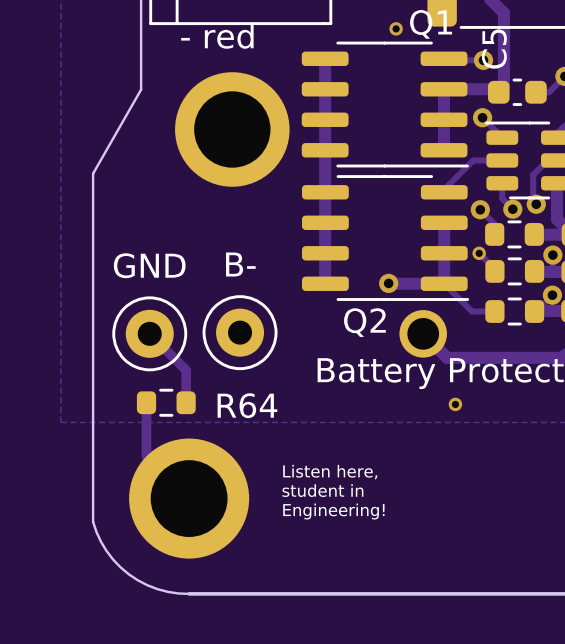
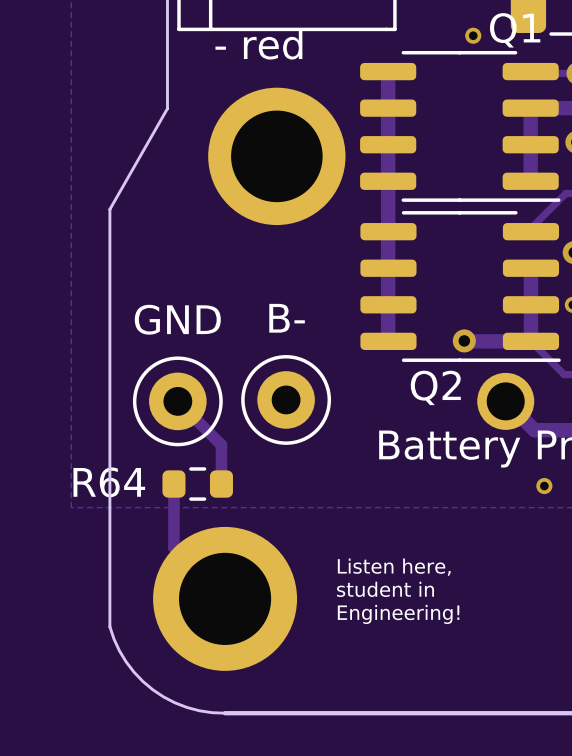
R64 name position: R64 (247, 405) -> R64 (109, 482)

